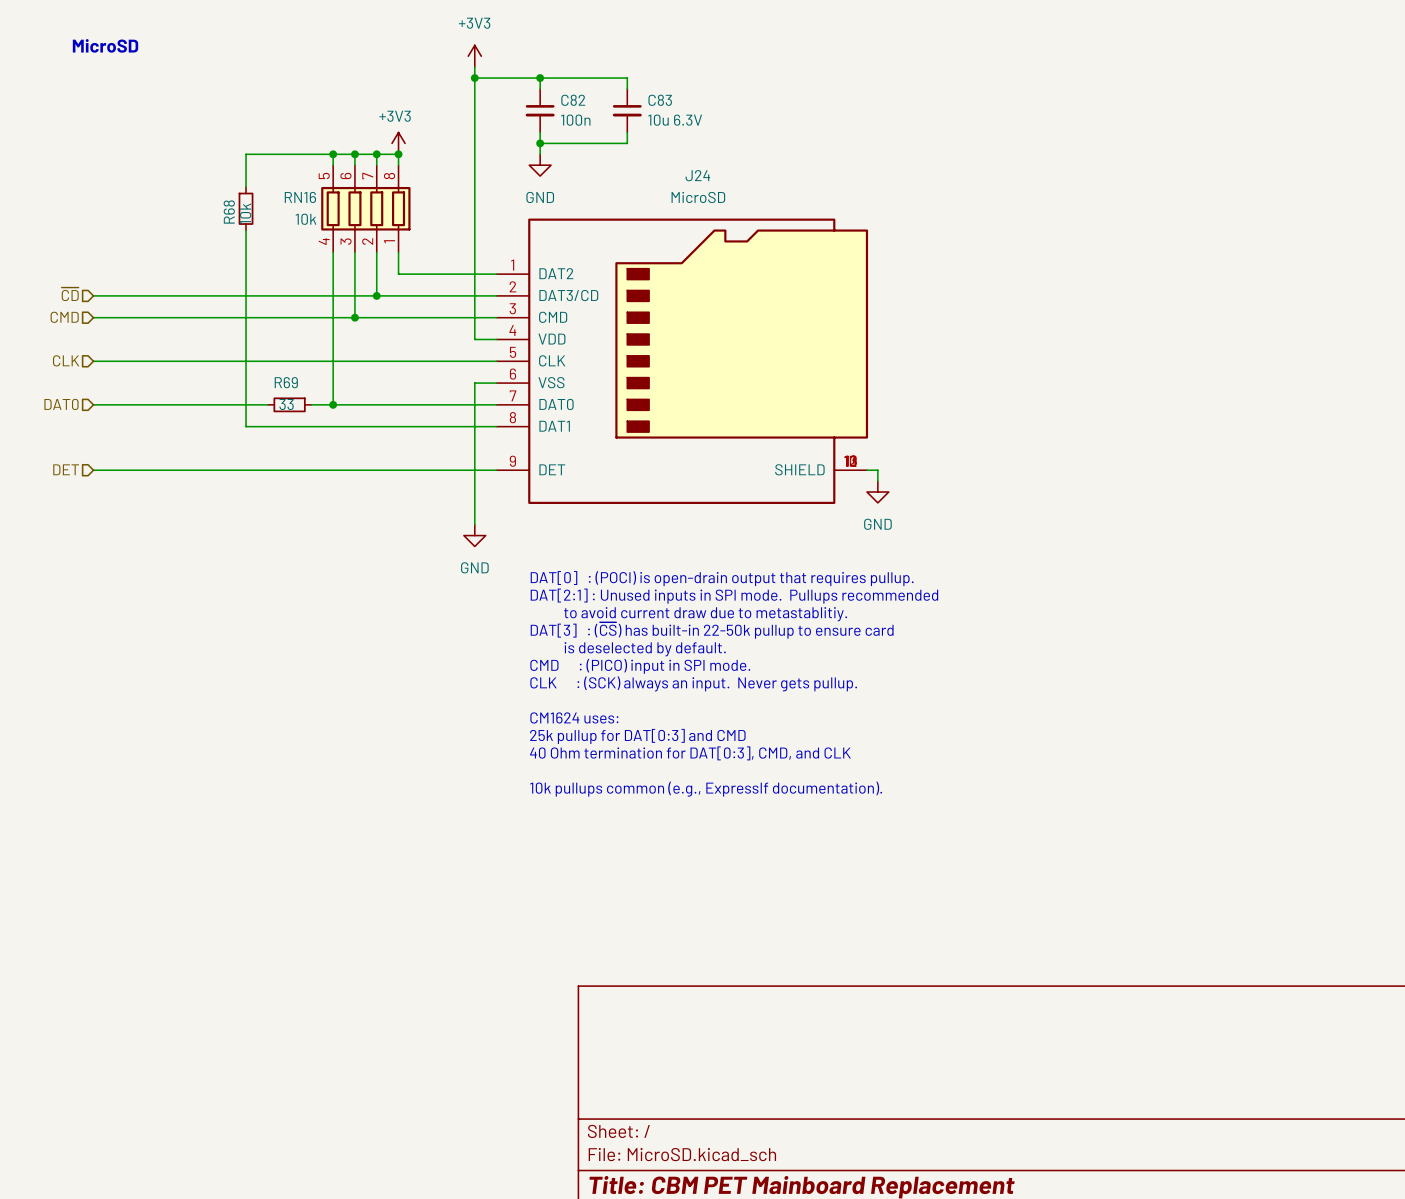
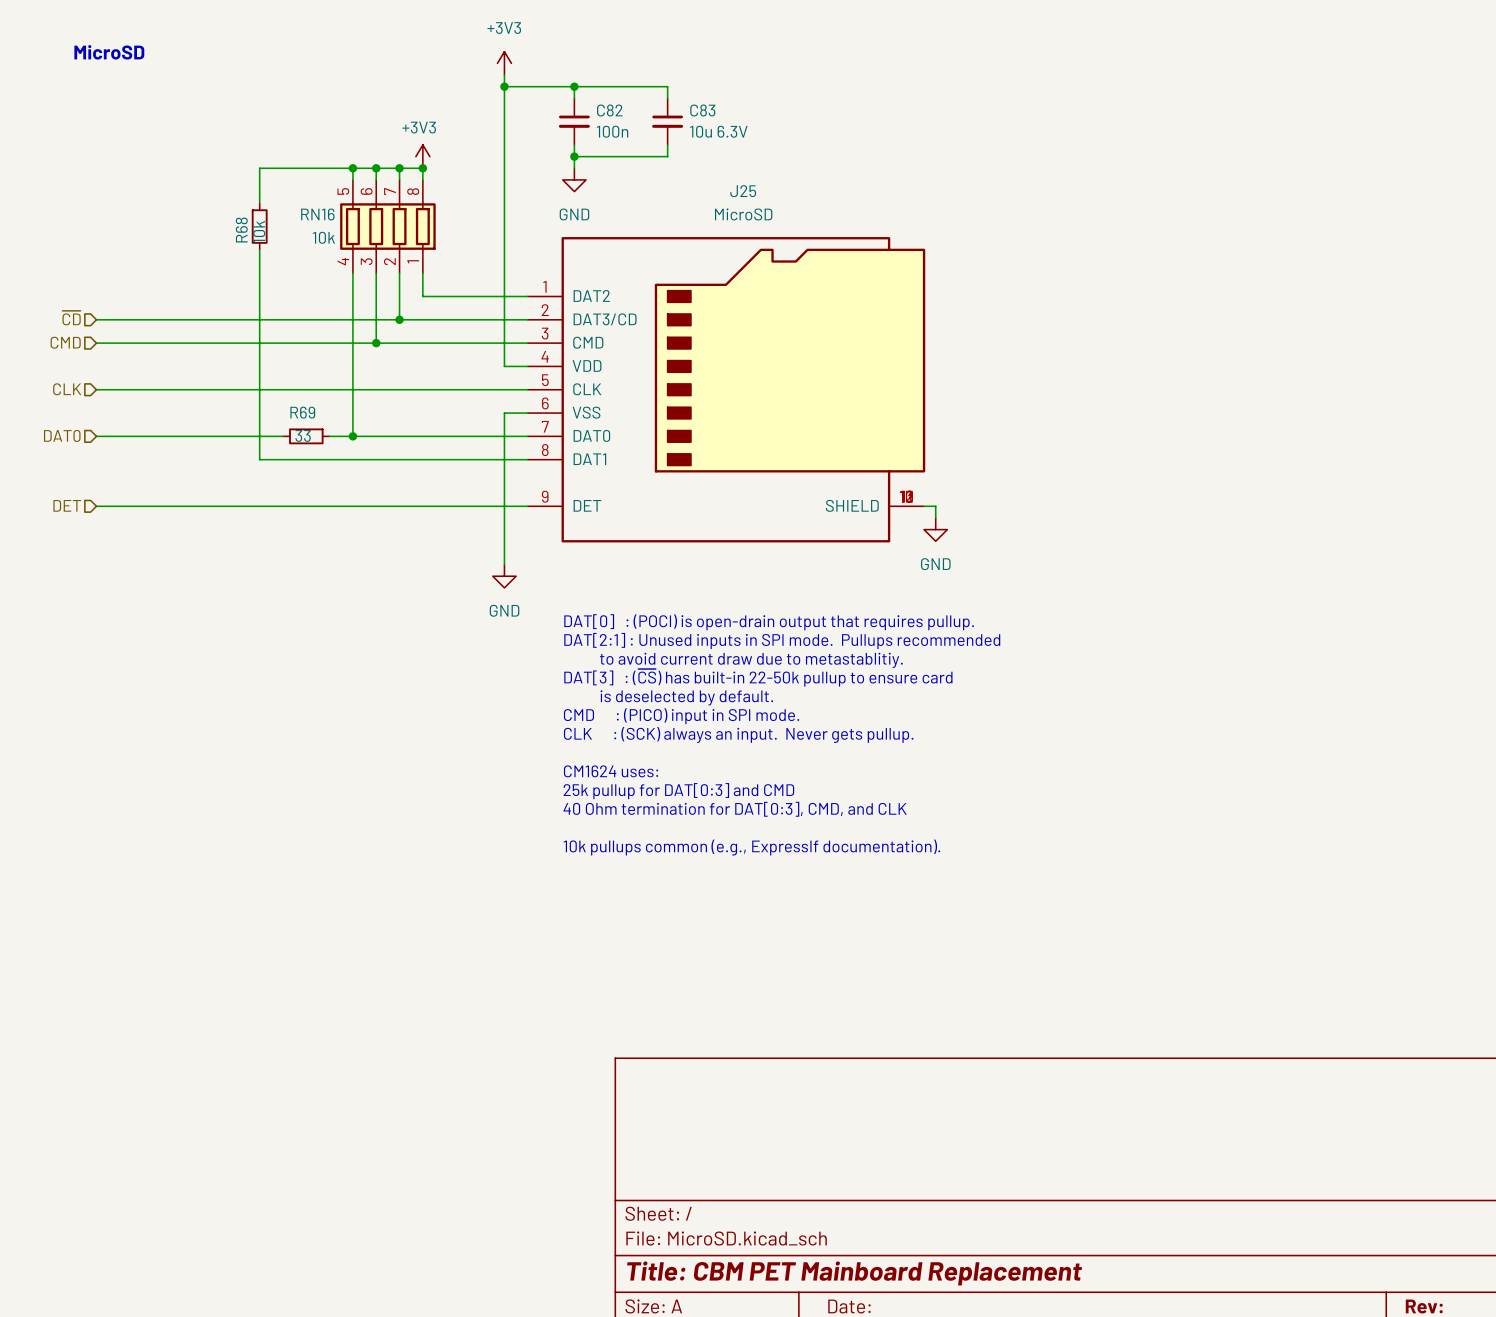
J24 name: J24 (697, 175) -> J25 (743, 191)

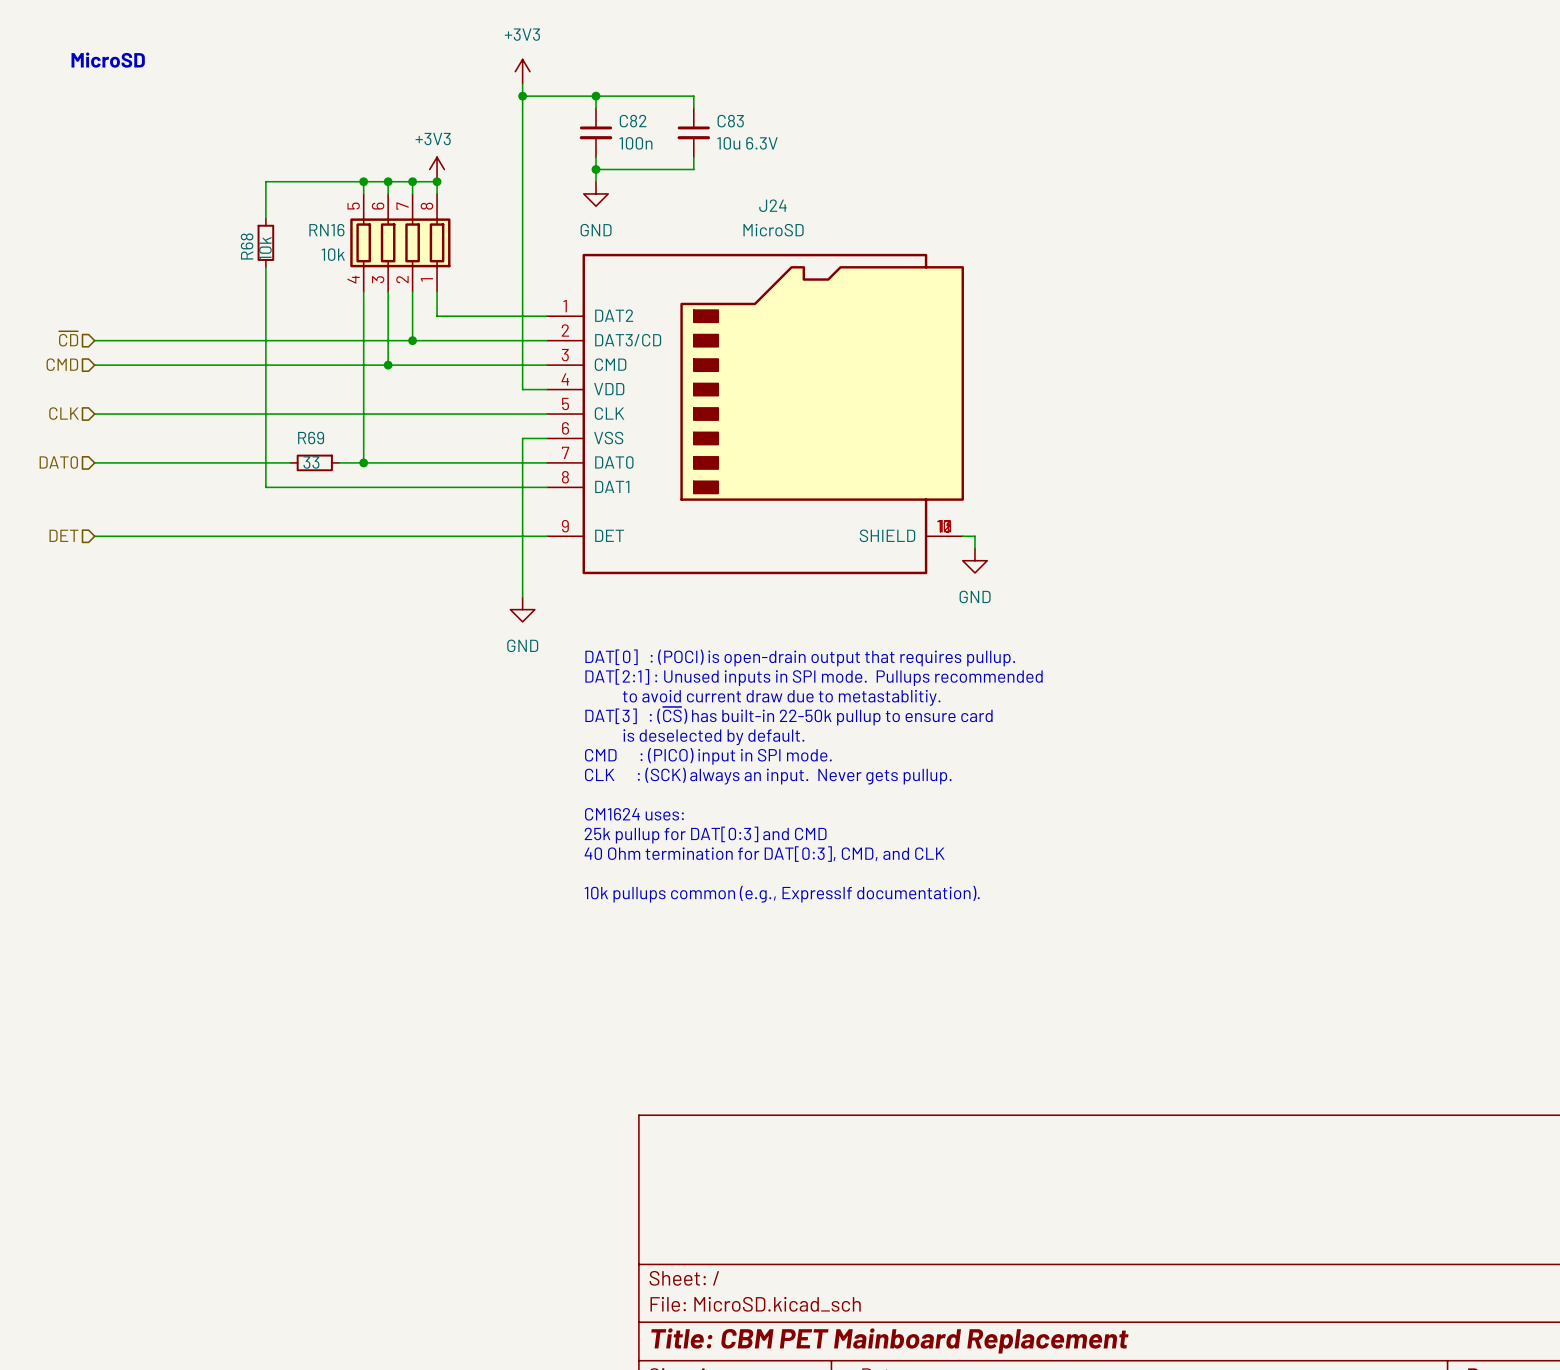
J25 name: J25 (743, 191) -> J24 (772, 205)

